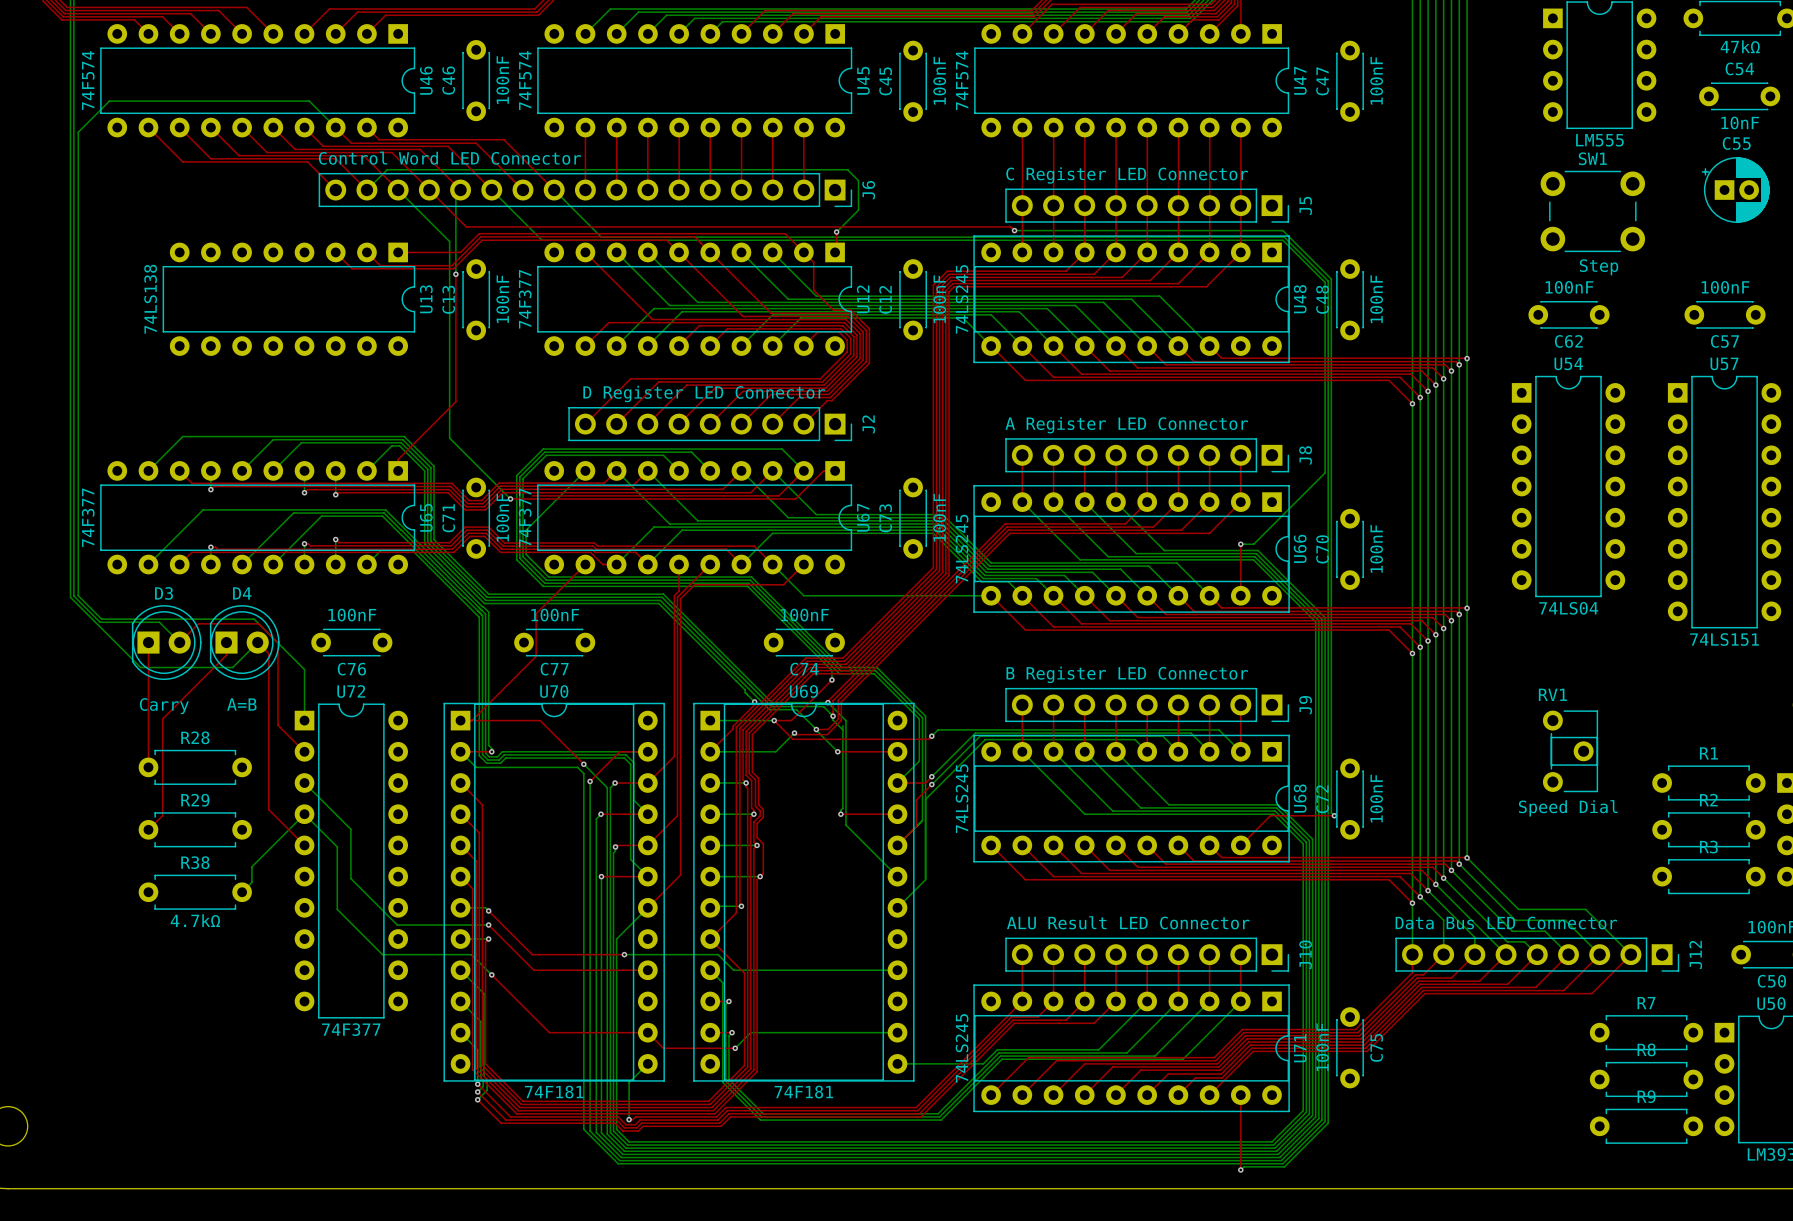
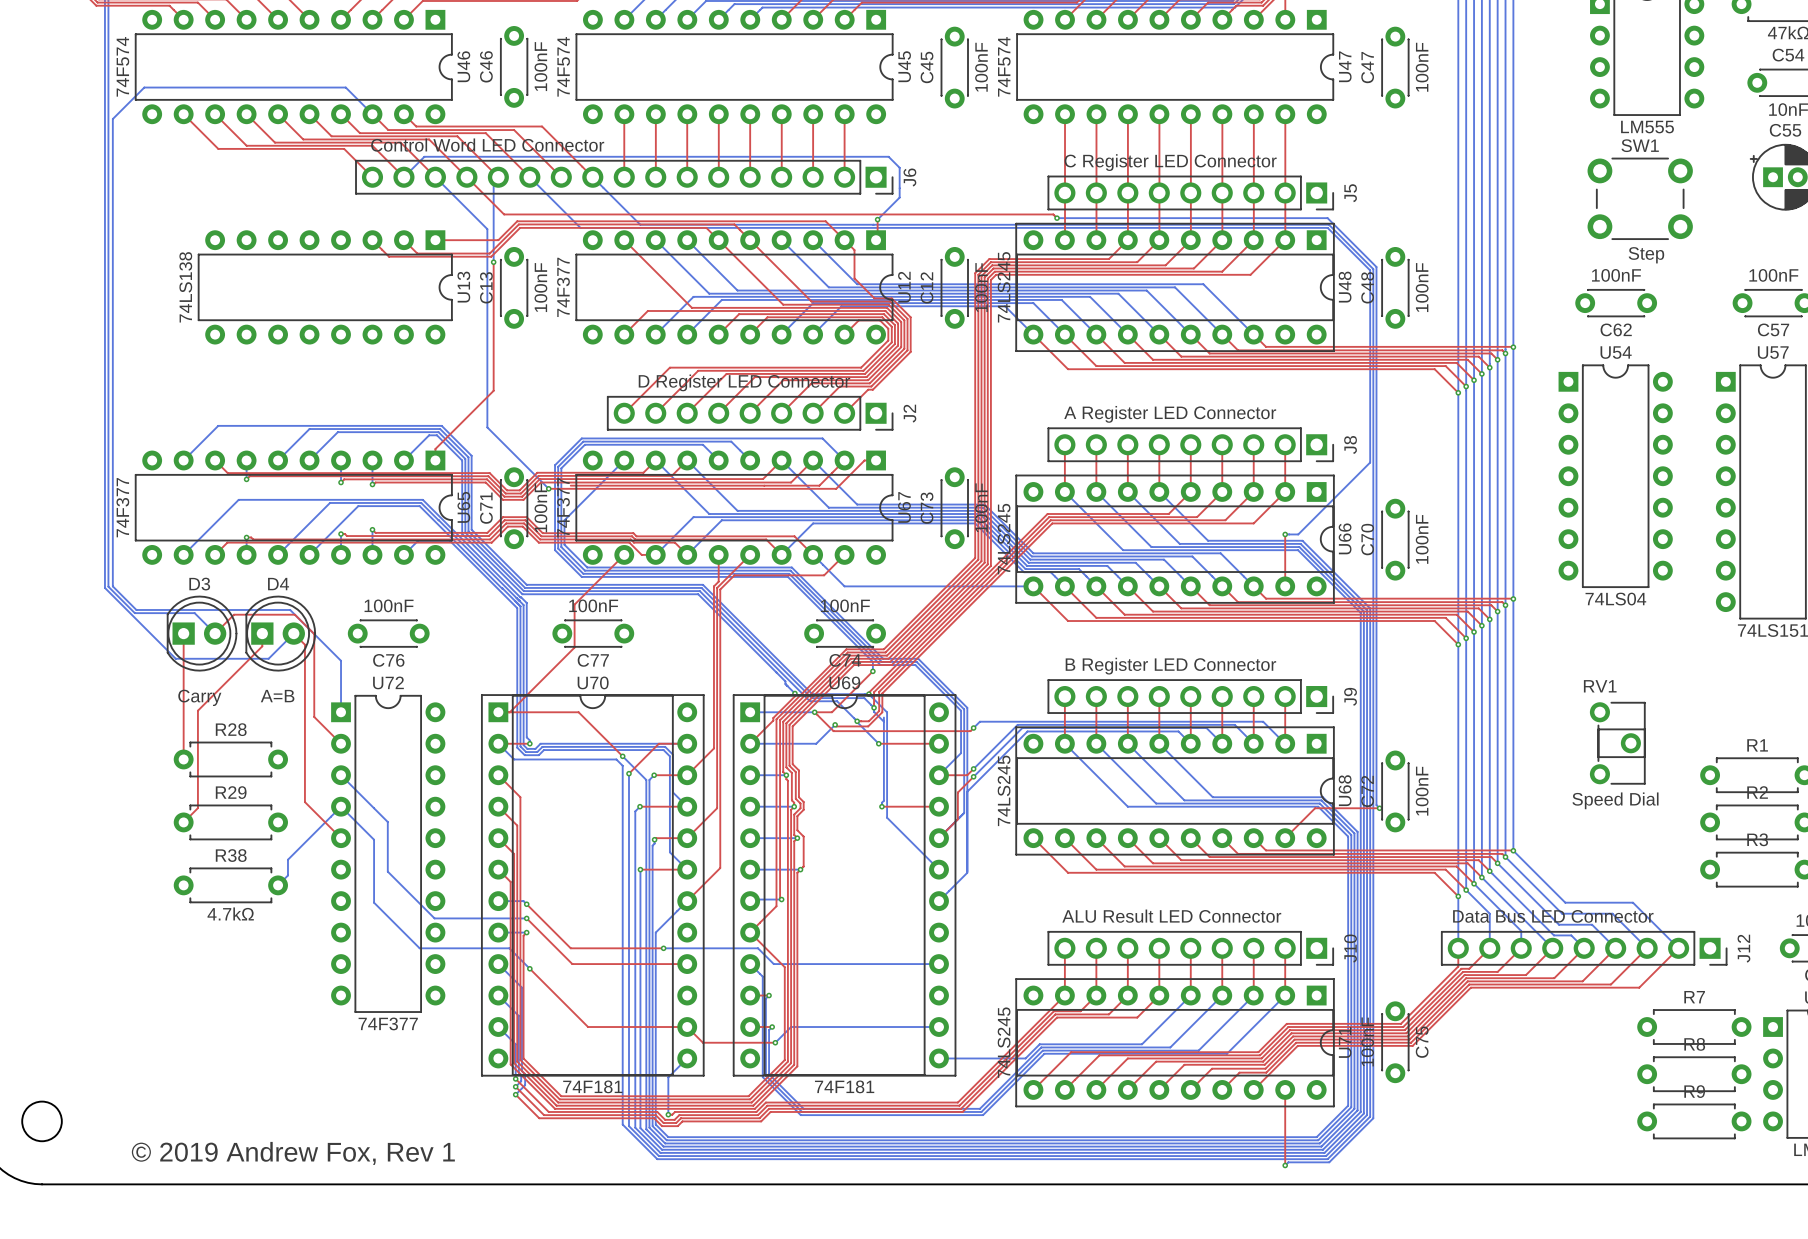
text: none -> © 2019 Andrew Fox, Rev 1 (293, 1153)

